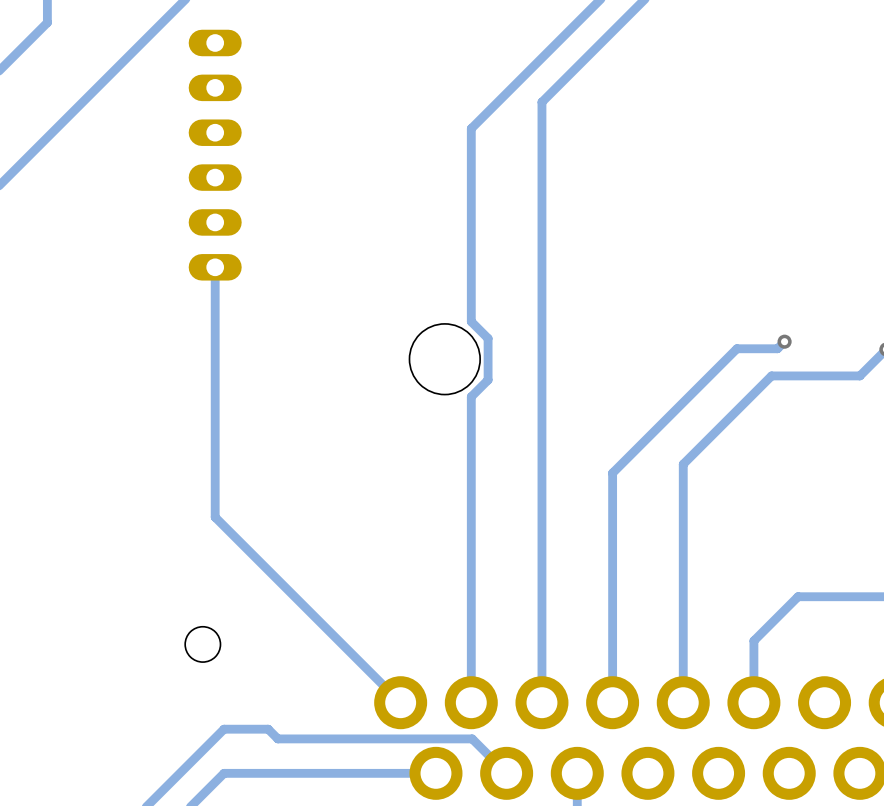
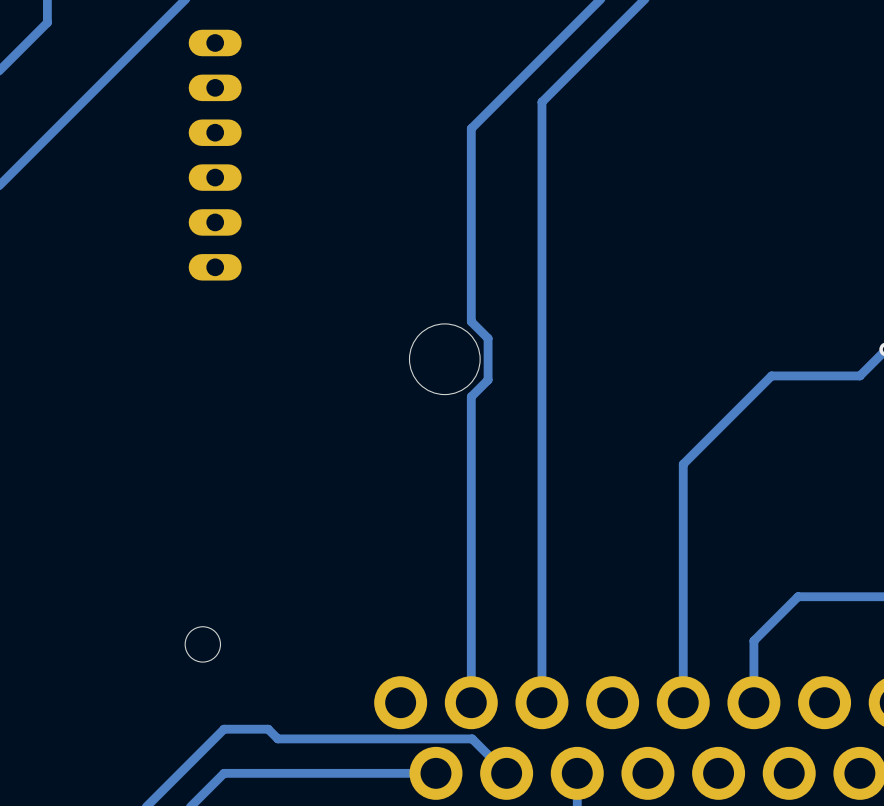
track: (215, 267) (215, 517) (400, 702) -> none
track: (784, 341) (777, 348) (736, 348) (612, 473) (612, 702) -> none
via: (784, 341) -> none

